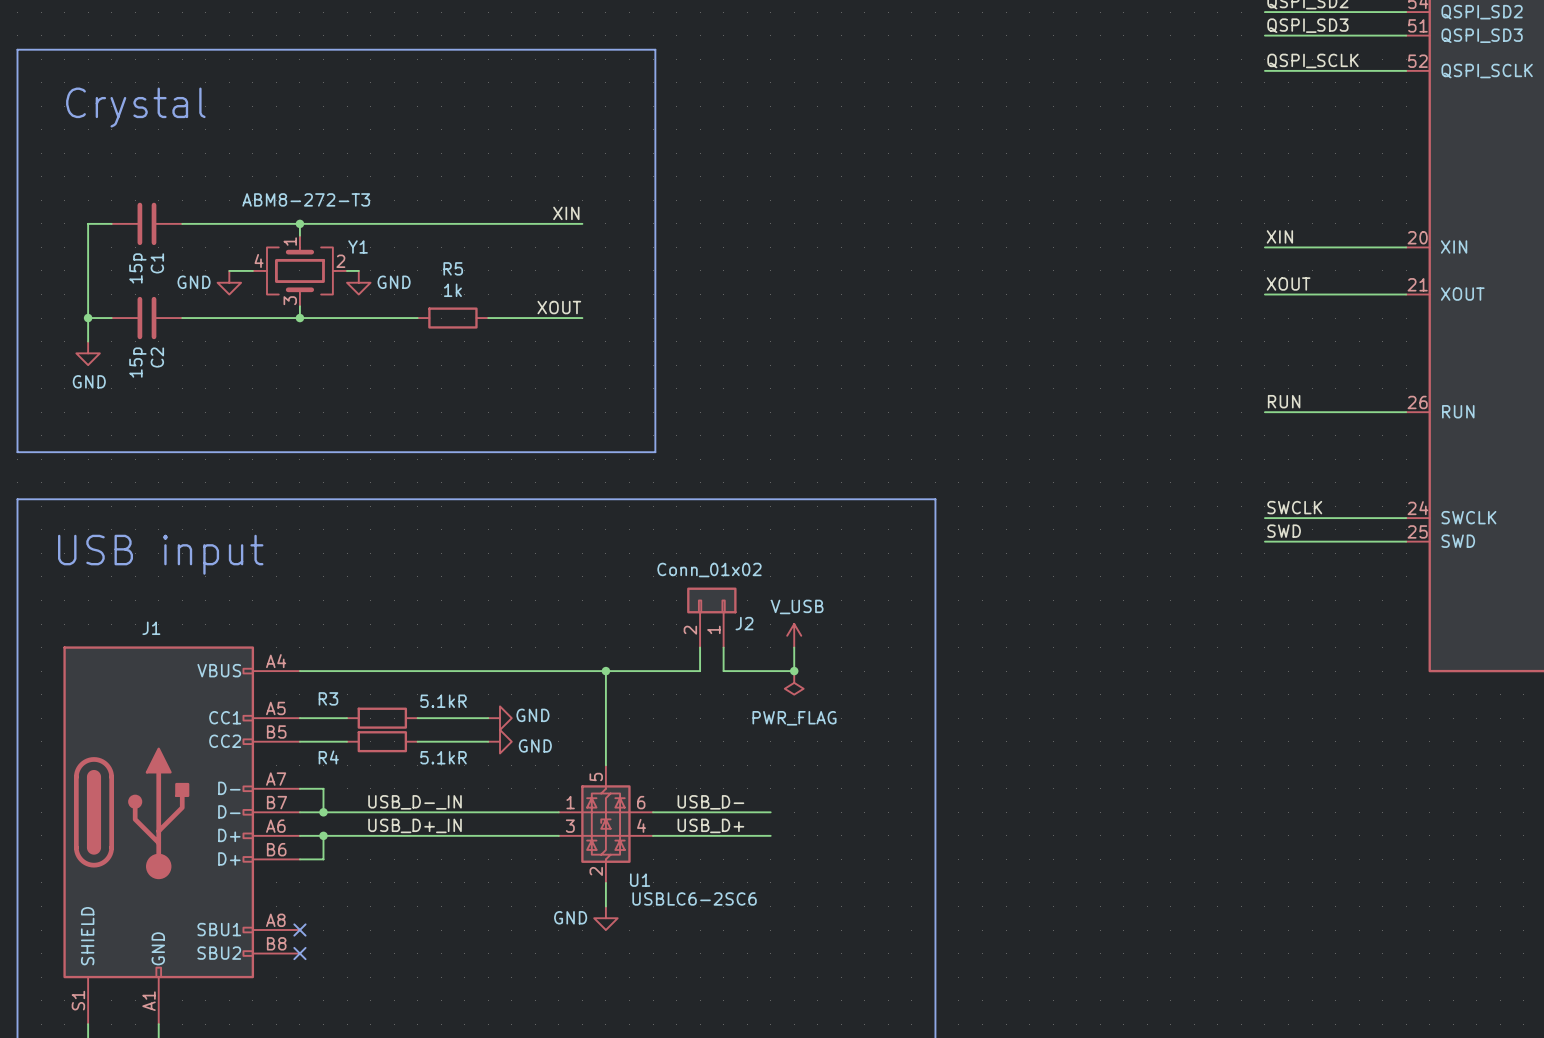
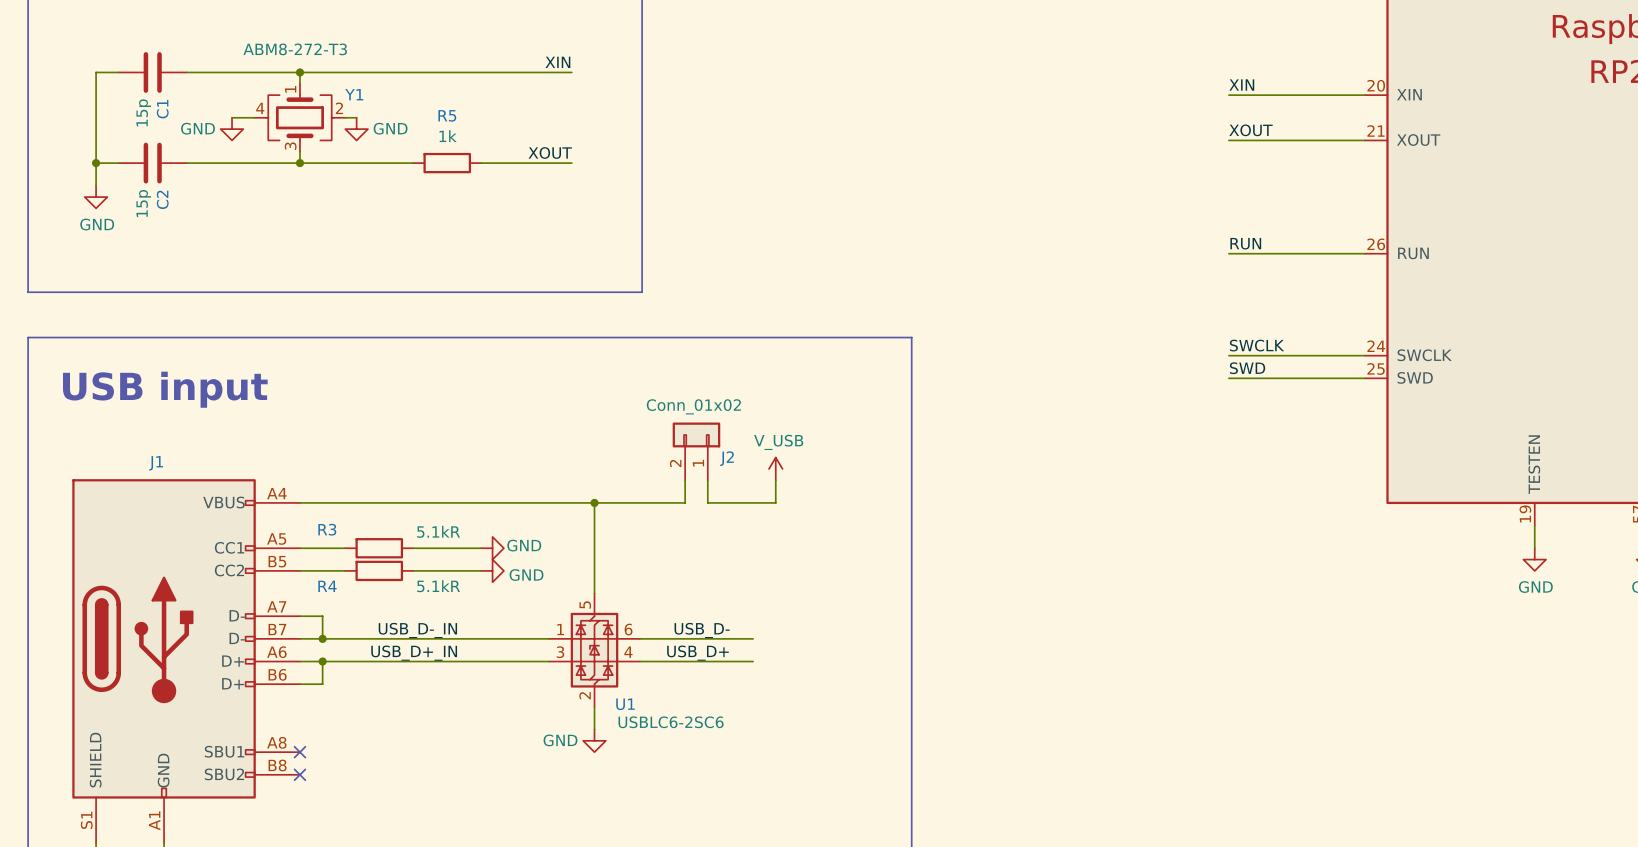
junction: (794, 671) -> none
power symbol: PWR_FLAG (794, 682) -> none

